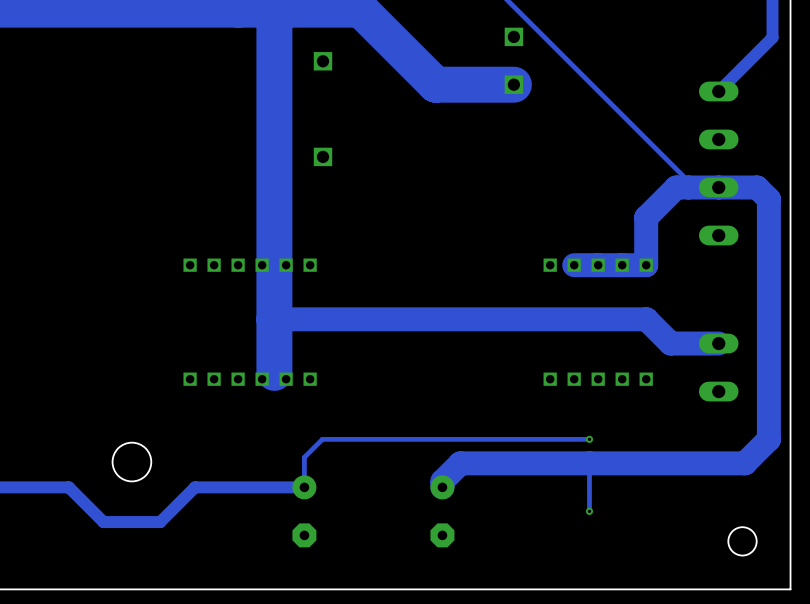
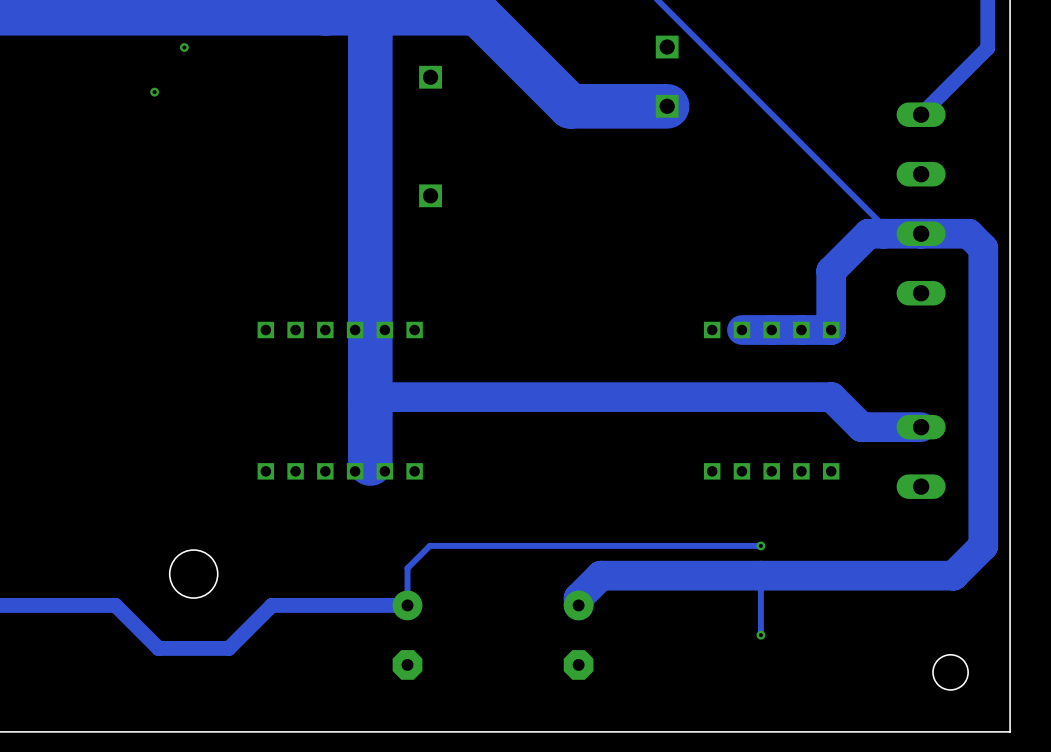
via: none -> (184, 47)
via: none -> (154, 92)

